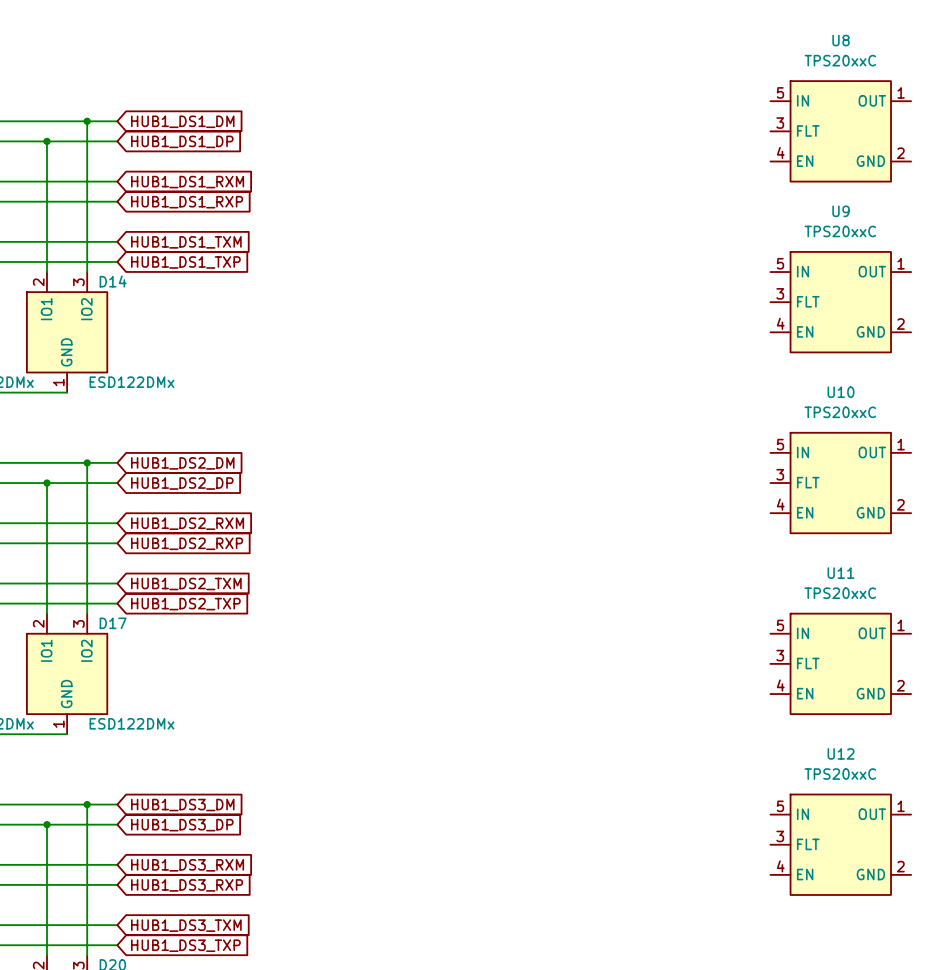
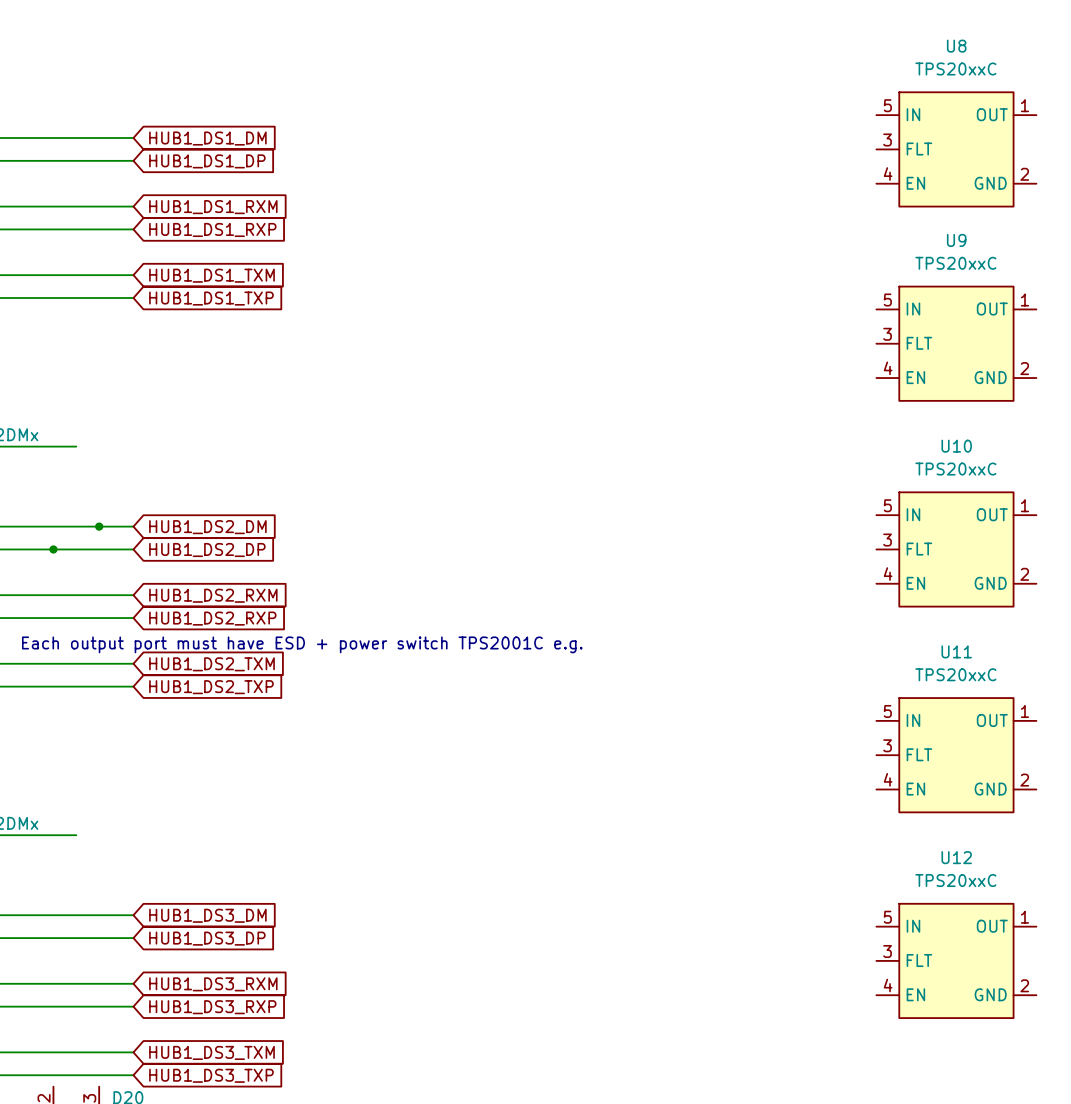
wire: (87, 121) (87, 272) -> none
junction: (87, 121) -> none
wire: (47, 141) (47, 272) -> none
junction: (47, 141) -> none
D14: ESD122DMx (67, 332) -> none
wire: (87, 462) (87, 613) -> none
wire: (47, 483) (47, 613) -> none
text: none -> Each output port must have ESD + power switch TPS2001C e.g. (302, 644)
D17: ESD122DMx (67, 673) -> none
wire: (87, 804) (87, 955) -> none
junction: (87, 804) -> none
wire: (47, 824) (47, 955) -> none
junction: (47, 824) -> none

